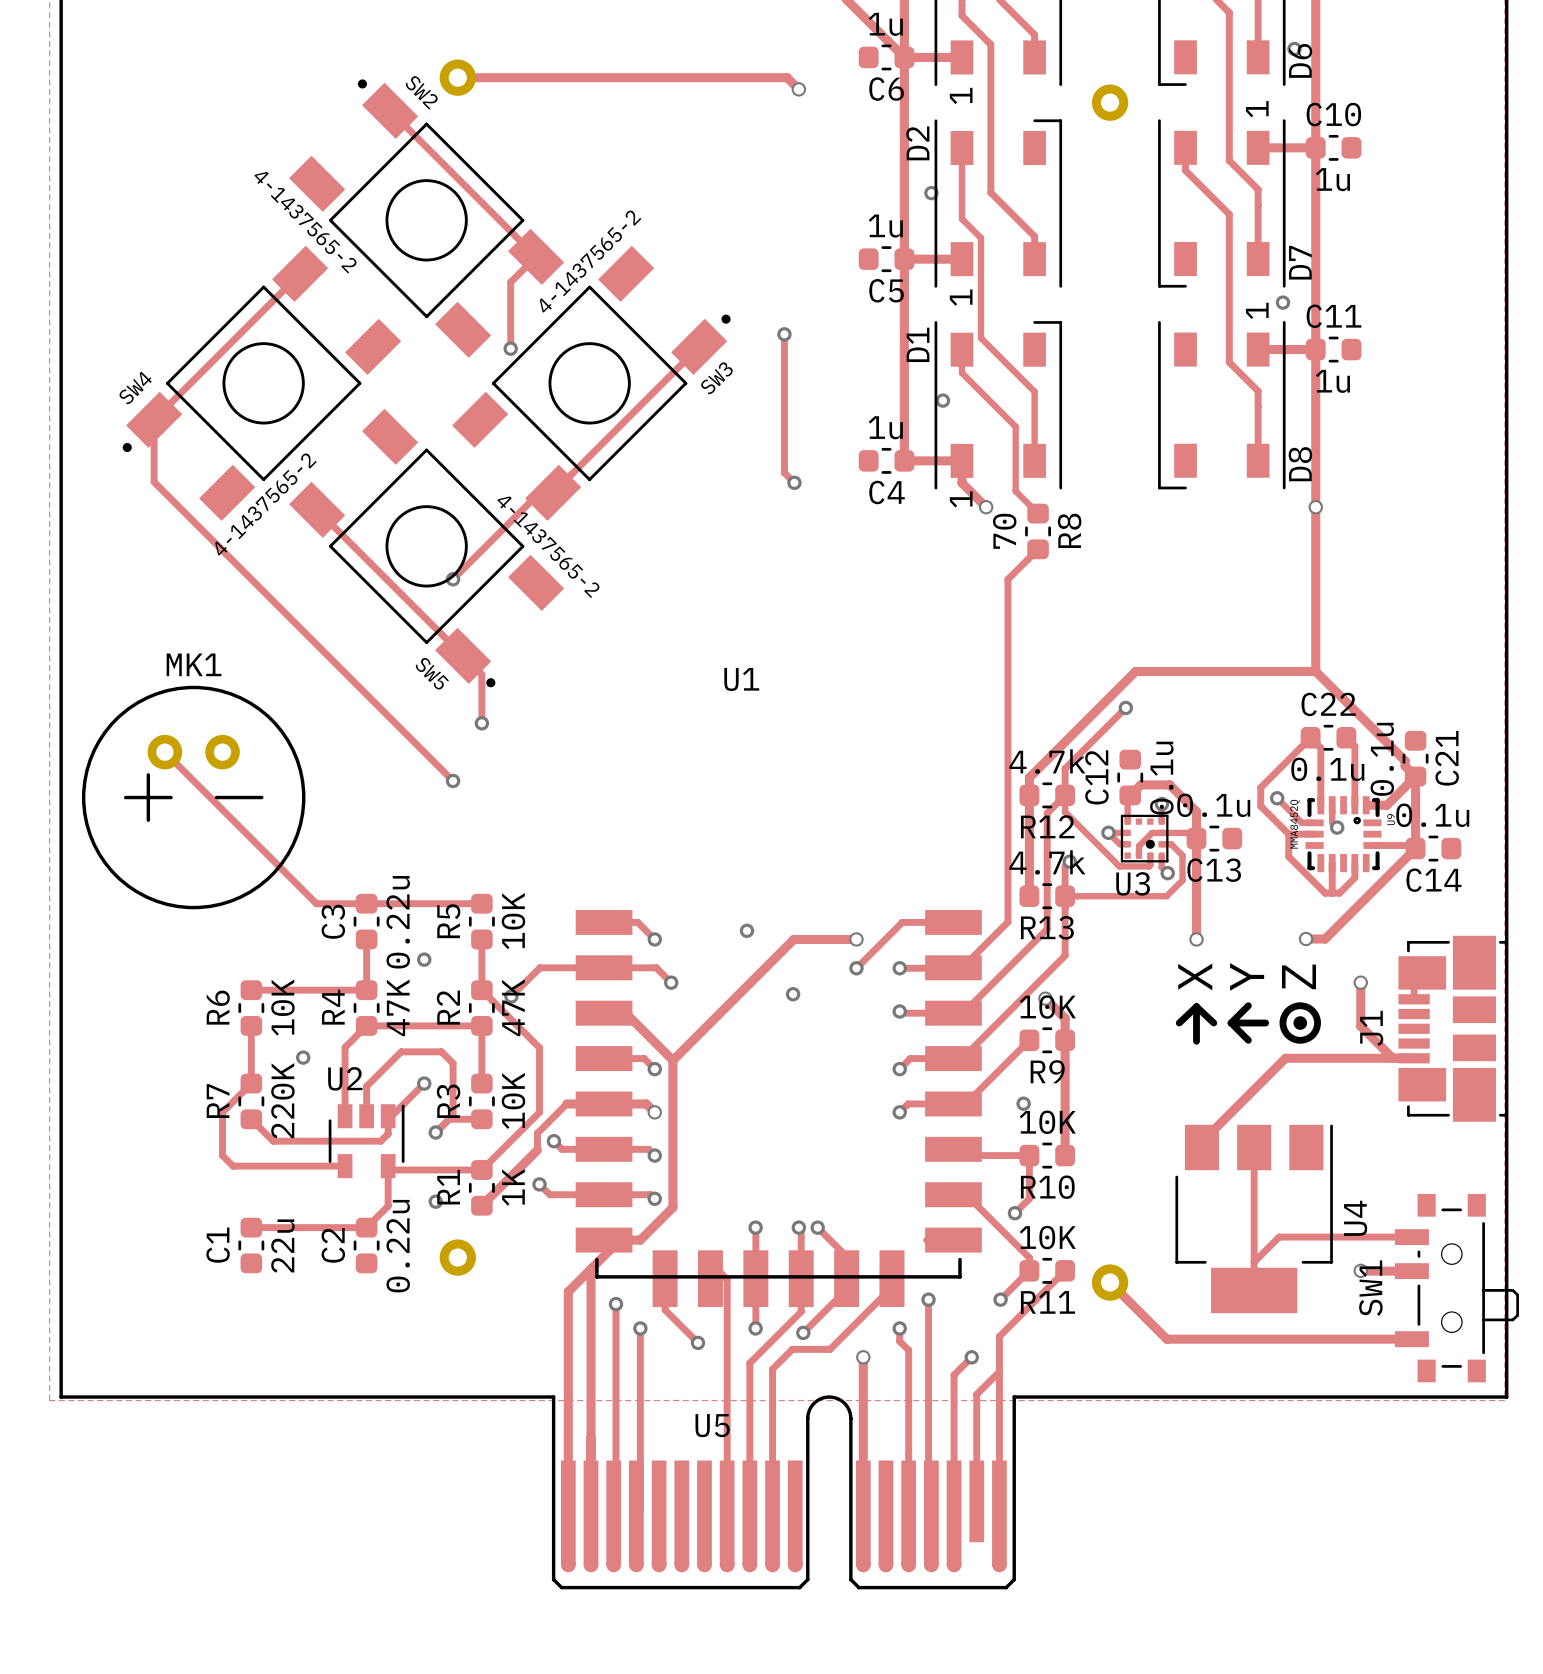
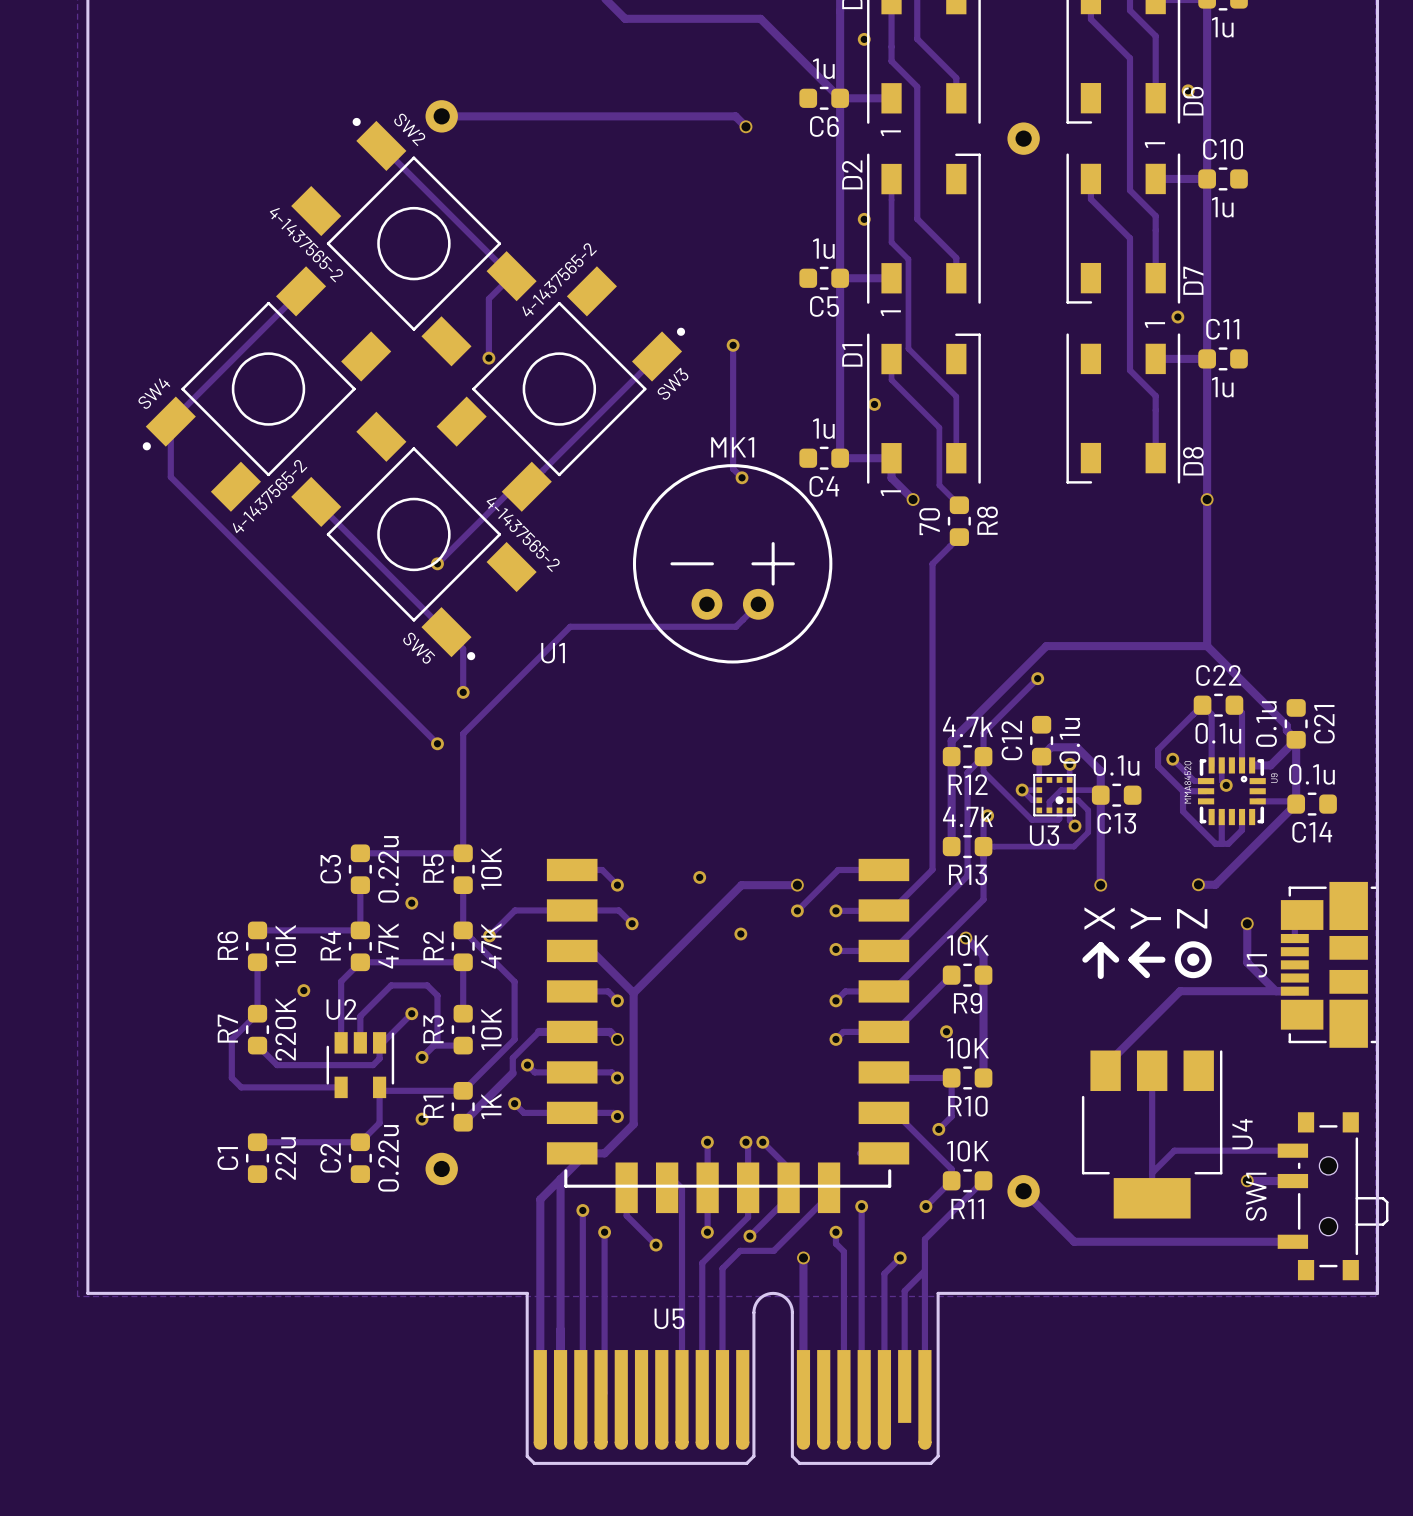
track: none -> (758, 604) (735, 626) (570, 626) (463, 733) (463, 853)
U1 name position: U1 (741, 679) -> U1 (553, 653)
track: (164, 752) (316, 903) (366, 903) -> none
MK1 rotation: 0° (193, 797) -> 180° (732, 563)
MK1 position: (193, 797) -> (732, 563)

